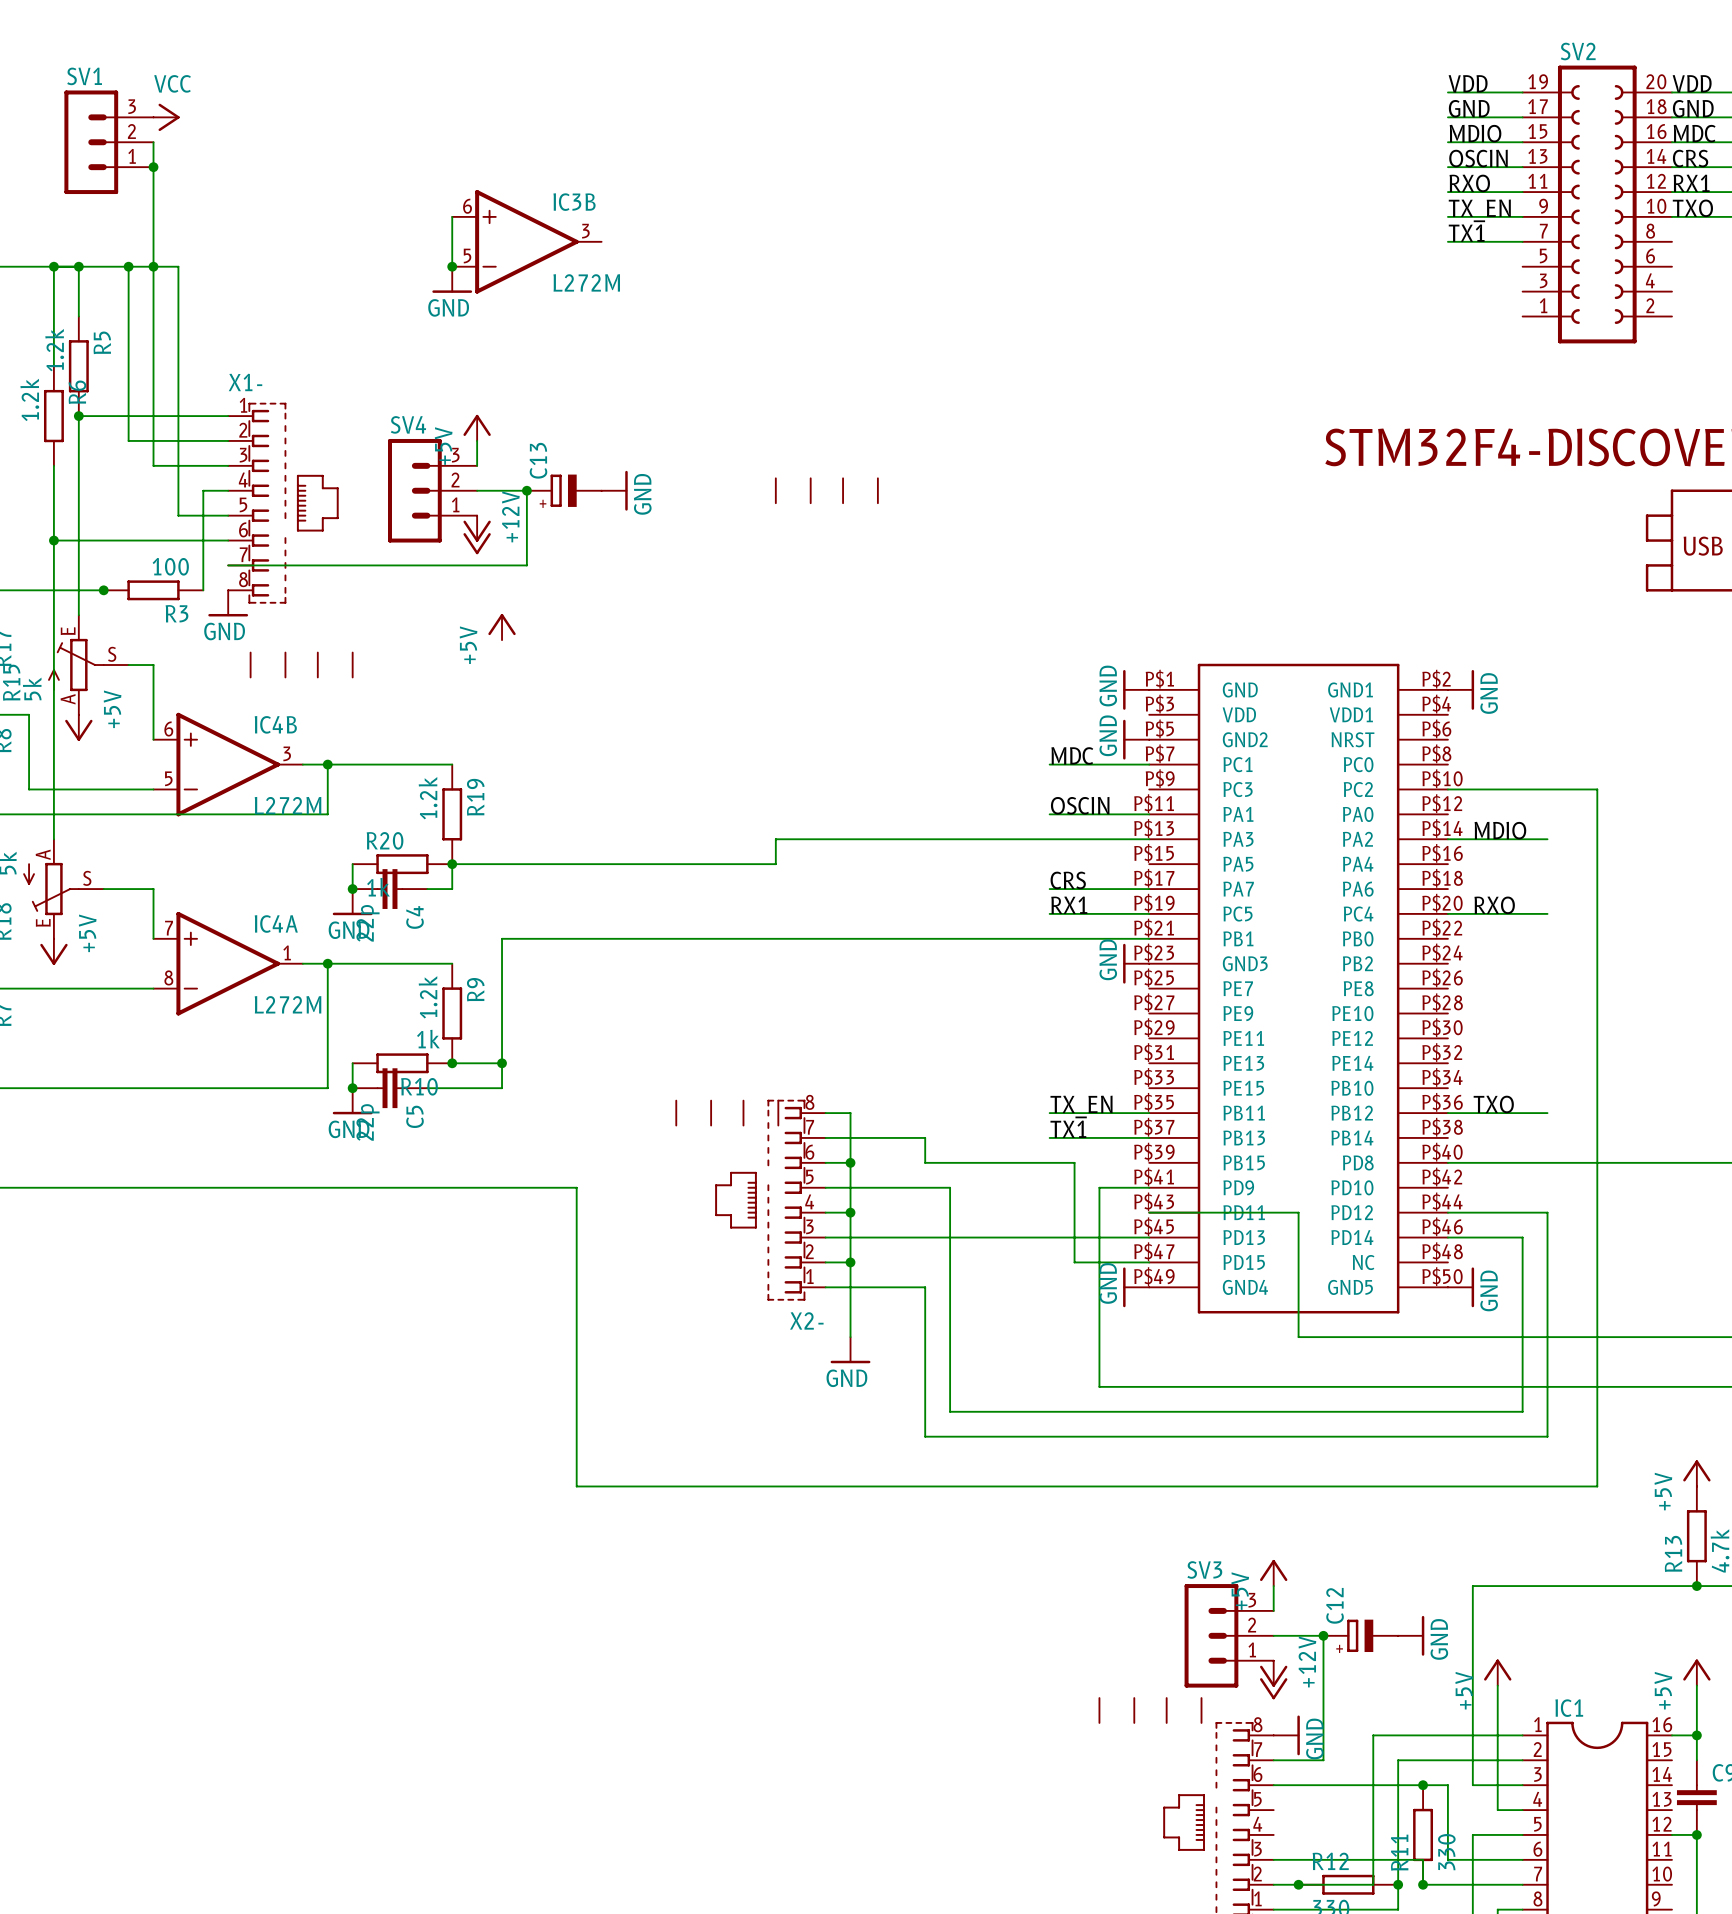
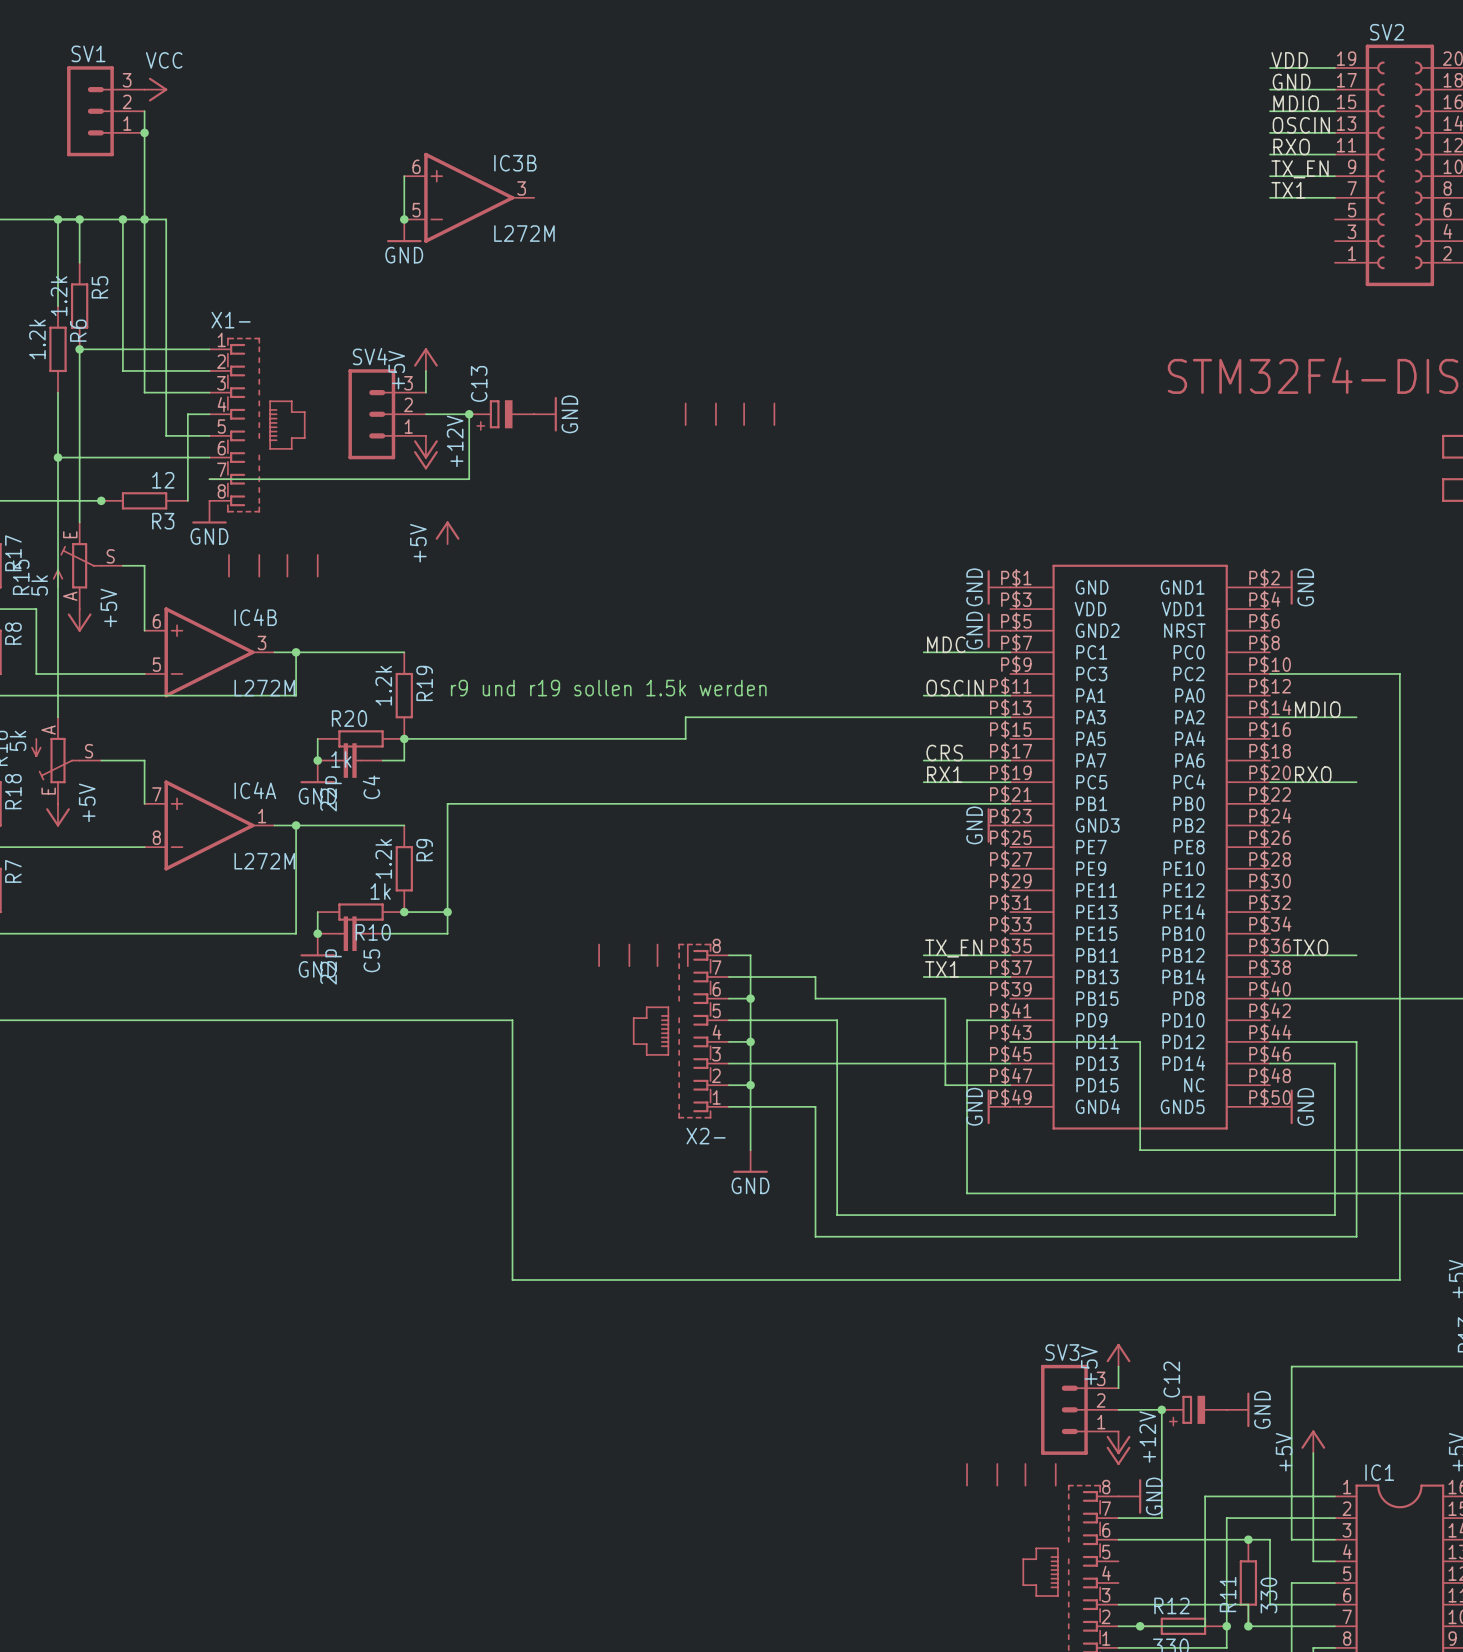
R3 value: 100 (170, 566) -> 12 (163, 480)
text: none -> r9 und r19 sollen 1.5k werden (608, 688)

